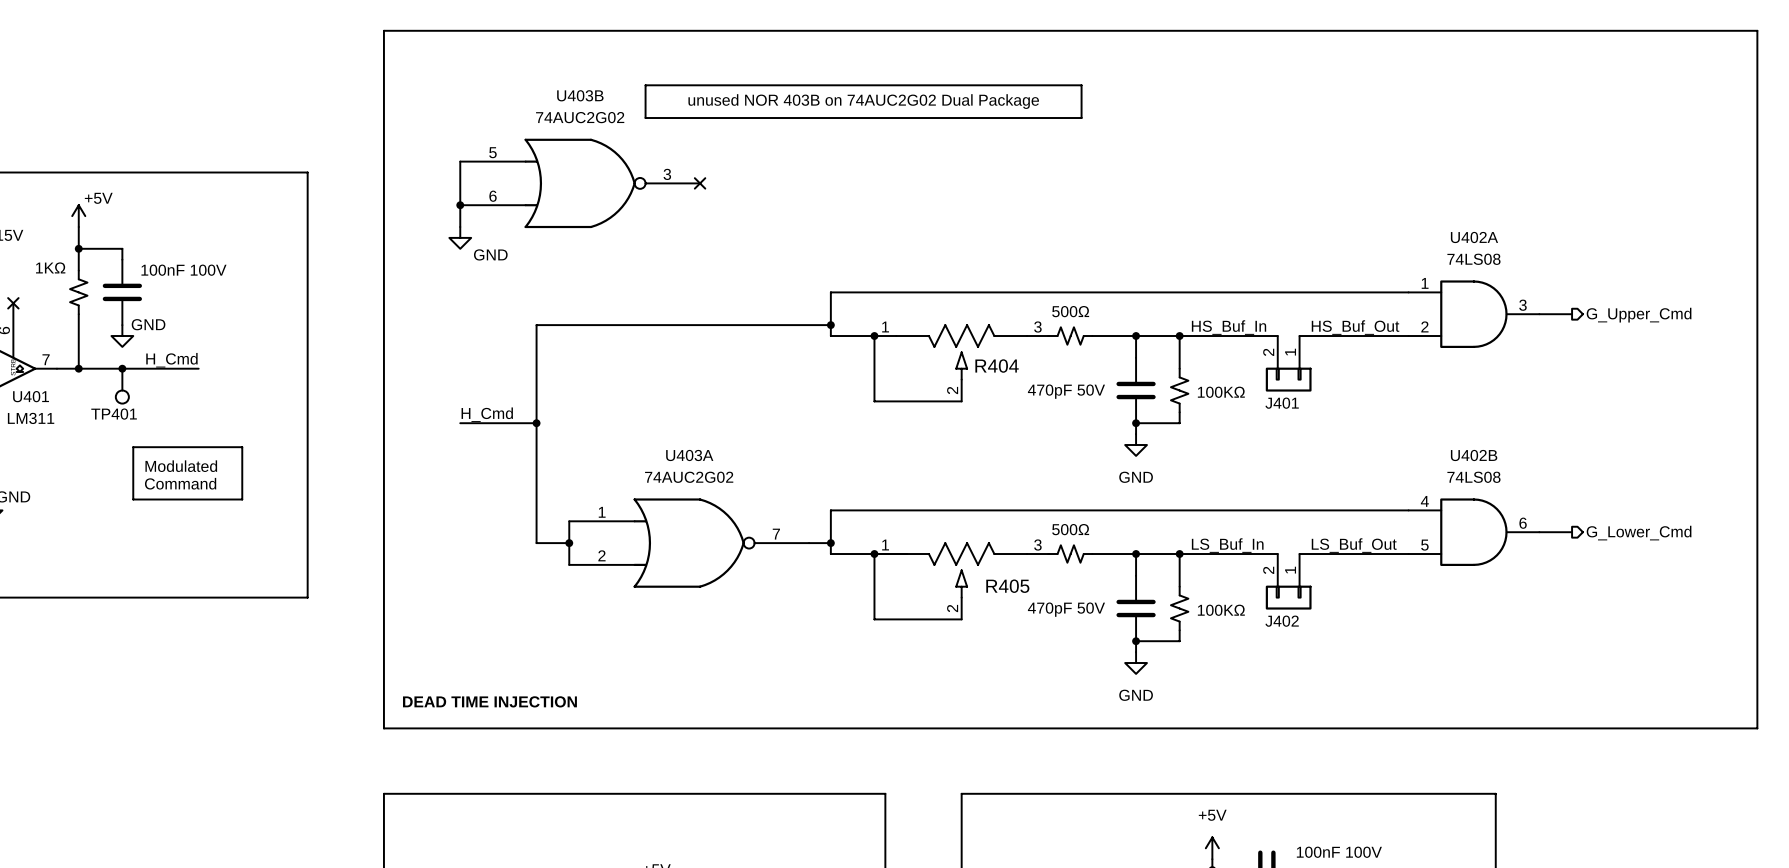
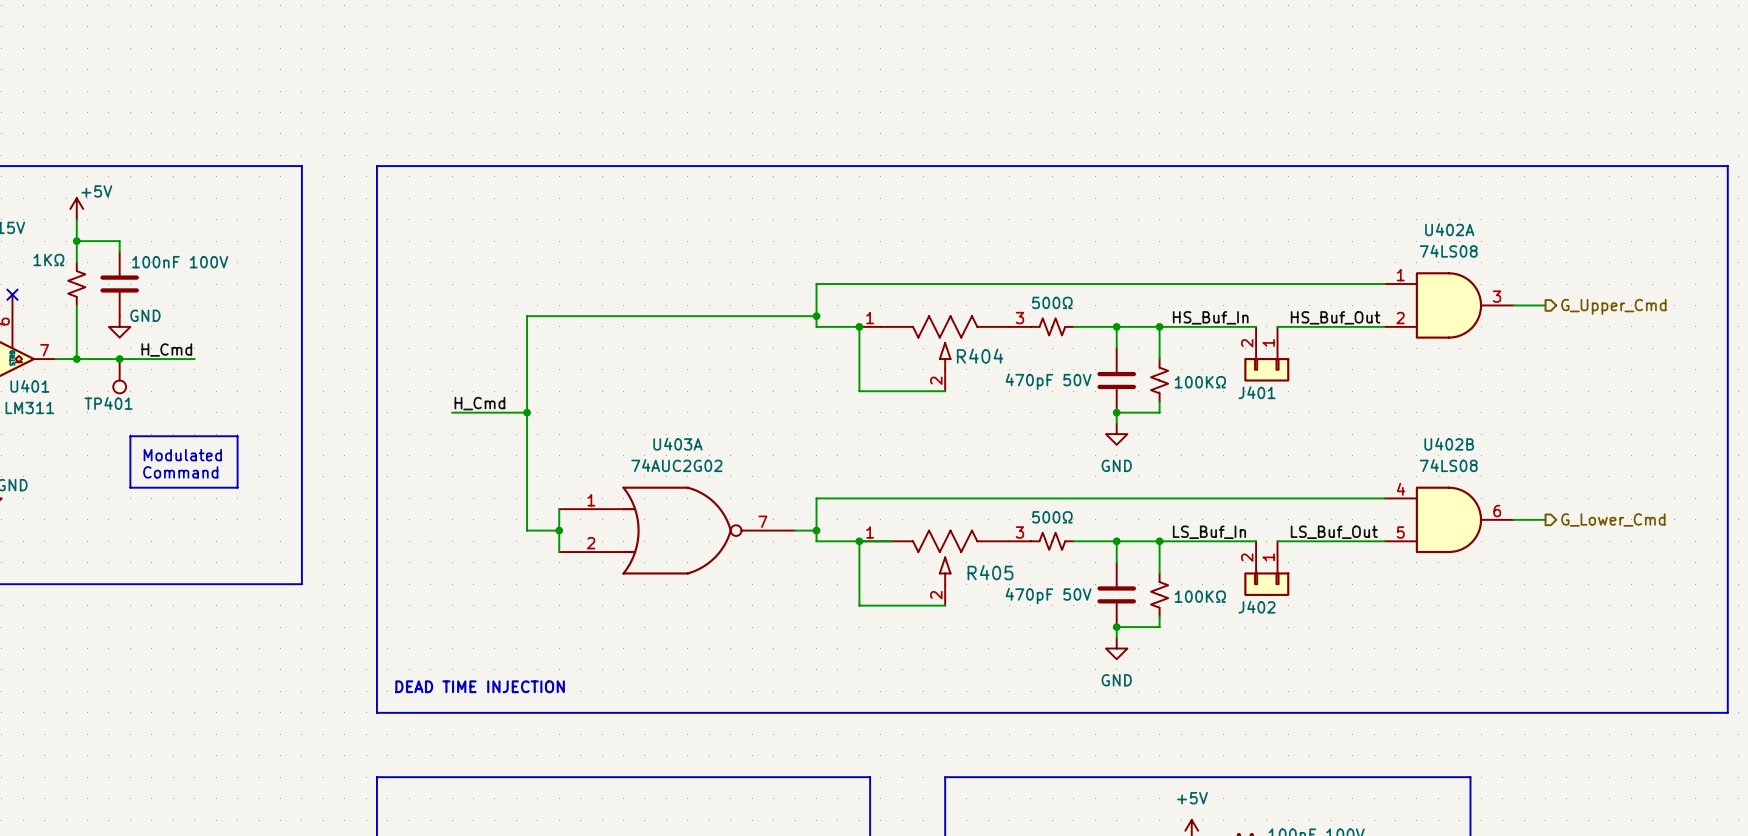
line: (645, 85) (1081, 85) (1081, 118) (645, 118) (645, 85) -> none
text: unused NOR 403B on 74AUC2G02 Dual Package (863, 101) -> none
wire: (460, 161) (460, 227) -> none
line: (383, 172) (383, 30) (1757, 30) (1757, 172) -> (376, 166) (1727, 166)
U403B: 74AUC2G02 (580, 183) -> none
no-connect mark: (700, 183) -> none
junction: (460, 205) -> none
power symbol: GND (460, 237) -> none

